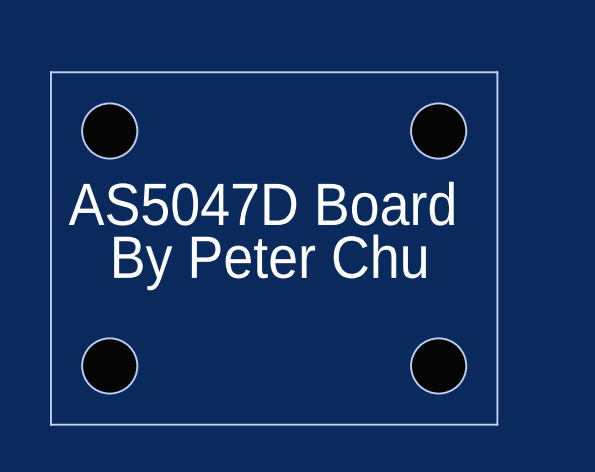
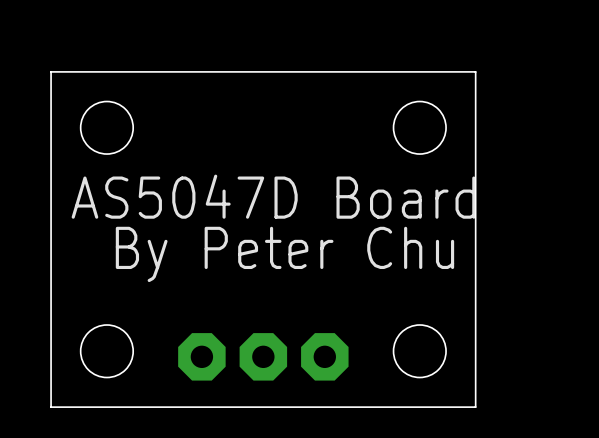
part: none -> (201, 356)
part: none -> (263, 356)
part: none -> (324, 356)

